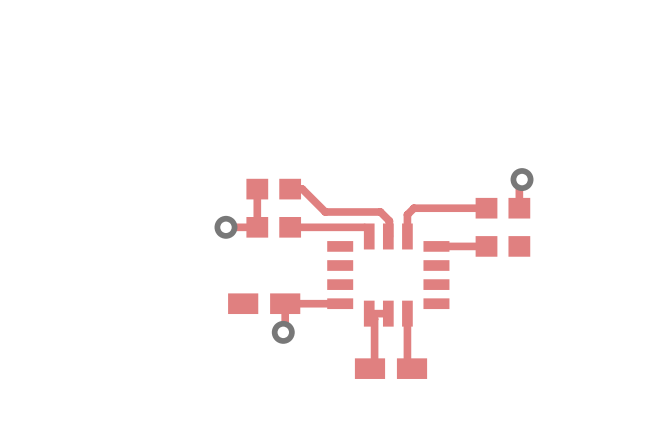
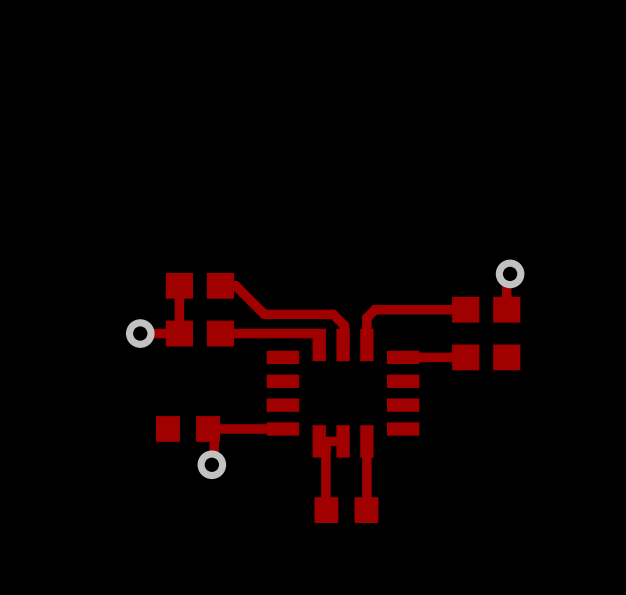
part footprint: [228, 293, 301, 315] -> [156, 416, 220, 442]
part footprint: [354, 358, 428, 379] -> [314, 497, 379, 523]

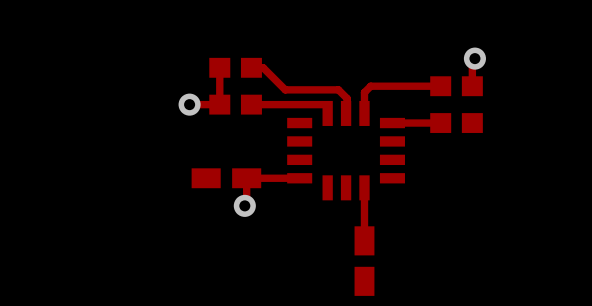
part footprint: [156, 416, 220, 442] -> [191, 168, 262, 189]
top track: (343, 441) (319, 441) (325, 448) (325, 510) -> none
part footprint: [314, 497, 379, 523] -> [354, 226, 375, 296]

